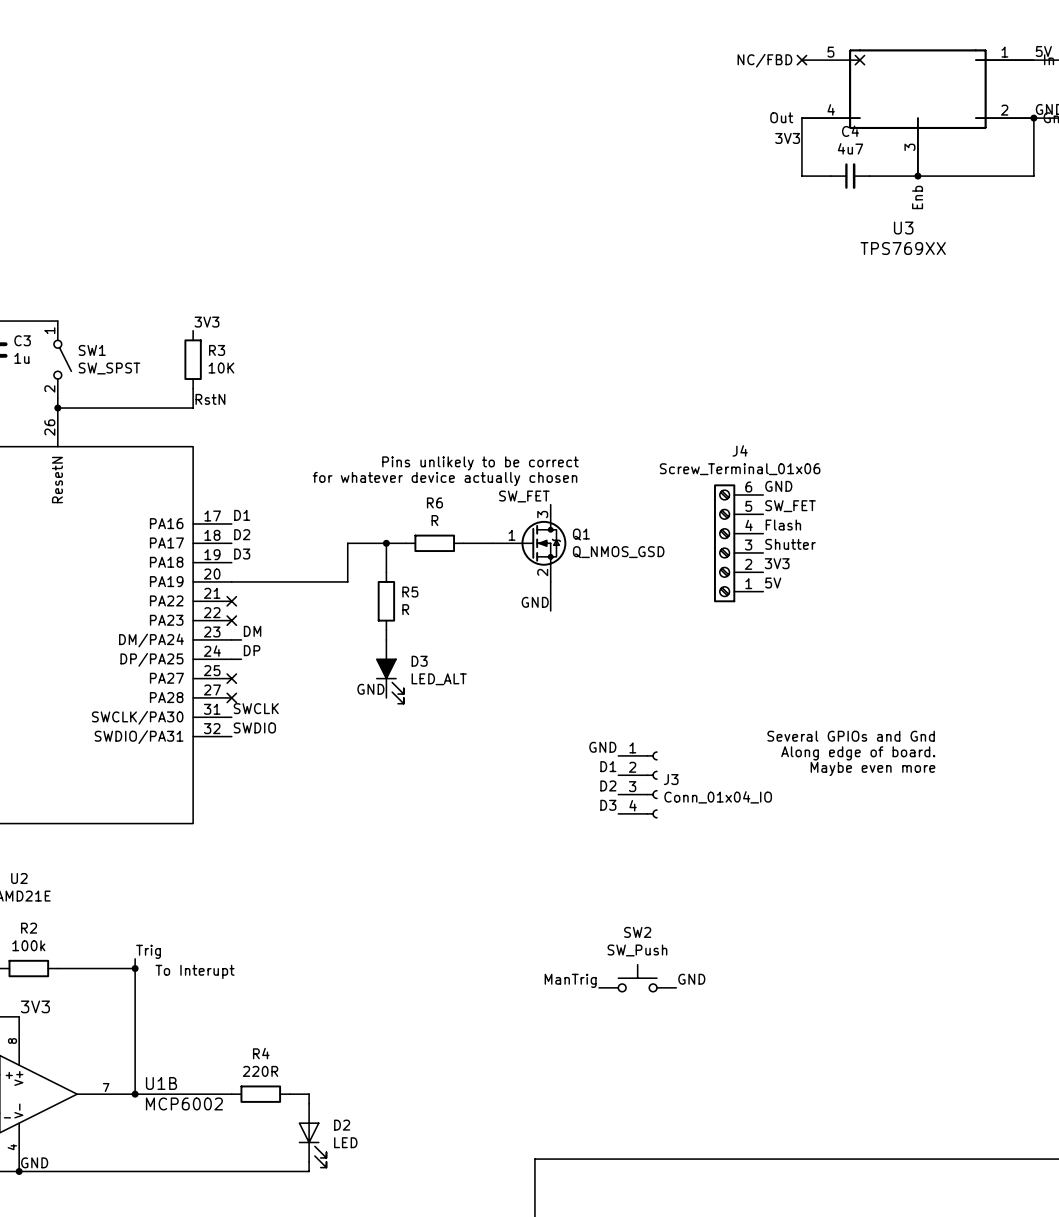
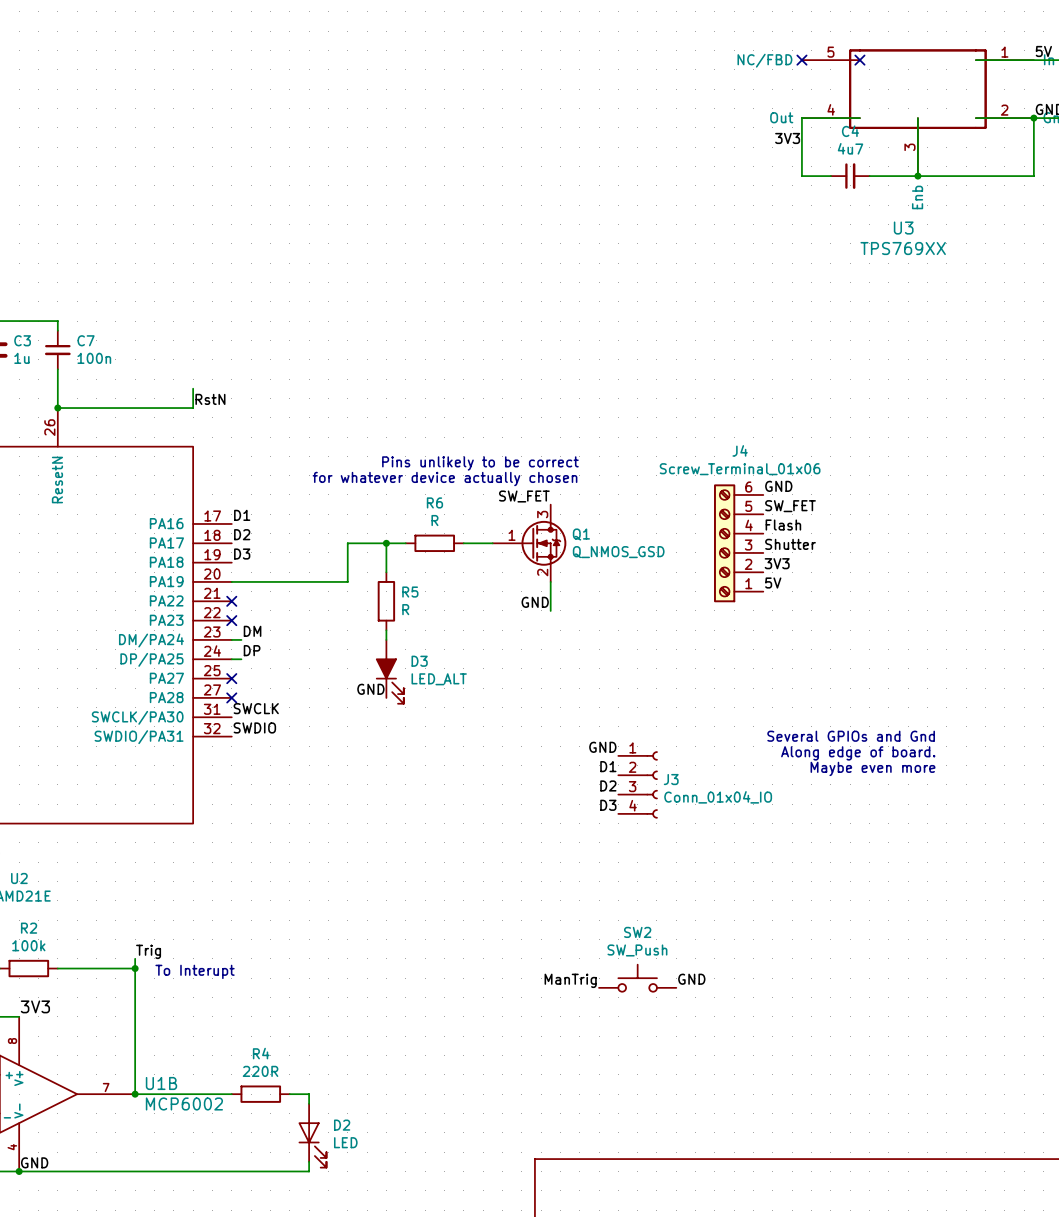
label: 3V3 (206, 322) -> none
C7: none -> 100n (57, 350)
SW1: SW_SPST (62, 359) -> none
R3: 10K (193, 359) -> none

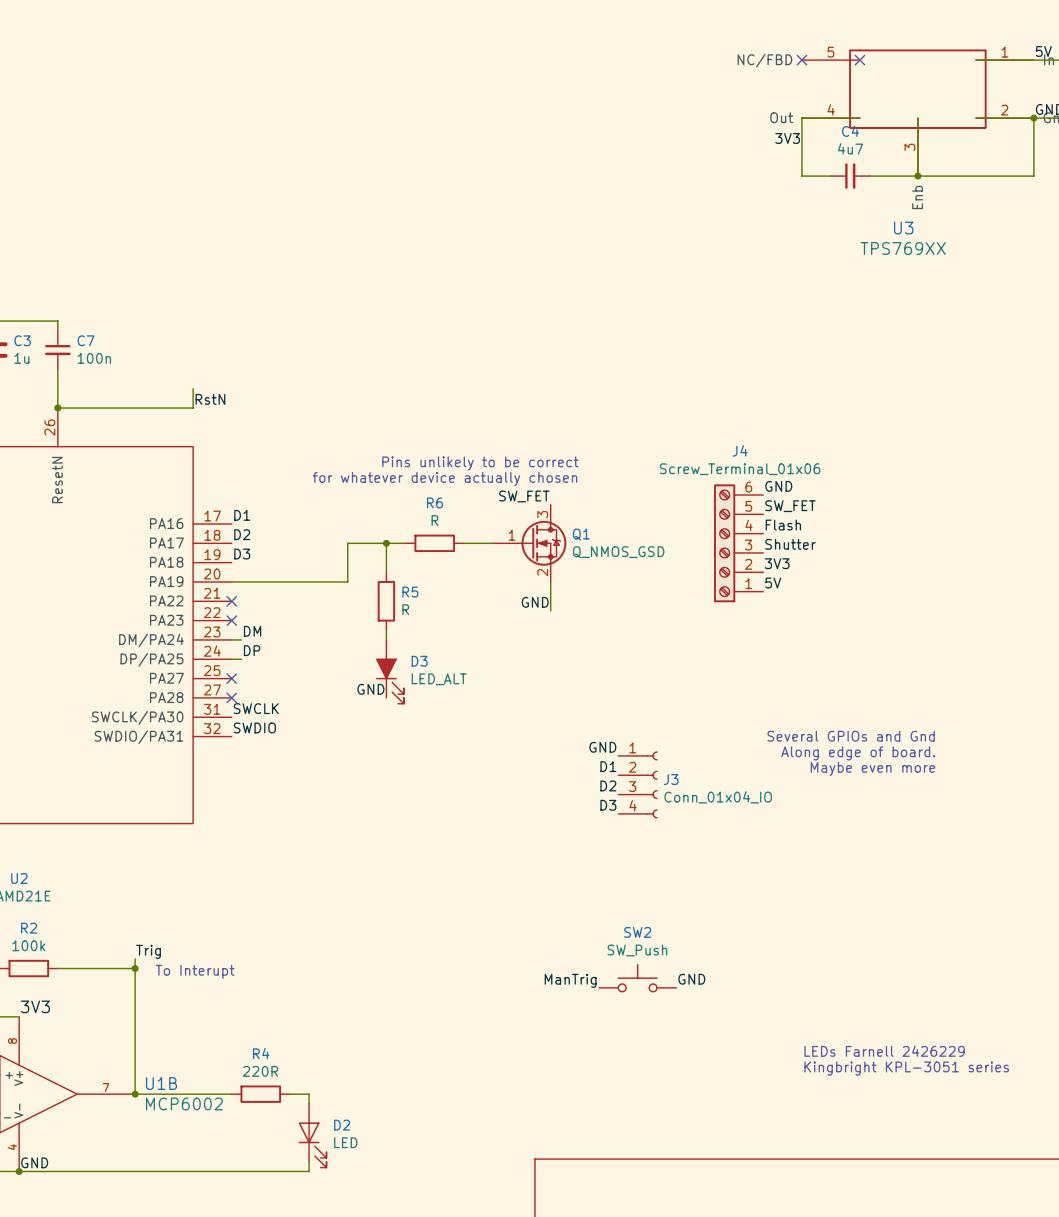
text: none -> LEDs Farnell 2426229 (884, 1051)
text: none -> Kingbright KPL-3051 series (906, 1068)

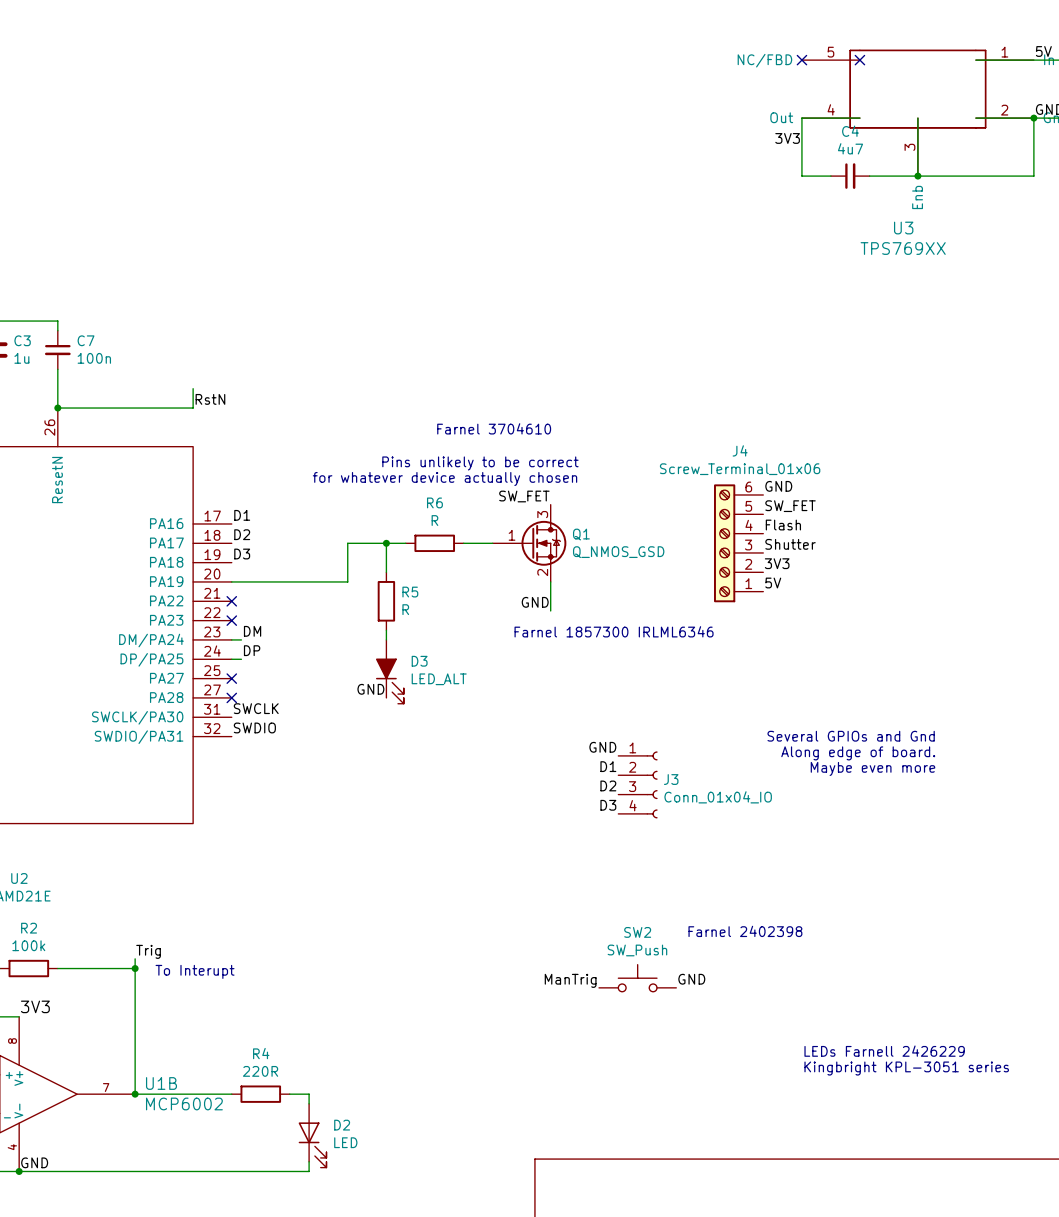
text: none -> Farnel 3704610 (494, 428)
text: none -> Farnel 1857300 IRLML6346 (614, 631)
text: none -> Farnel 2402398 (745, 931)

